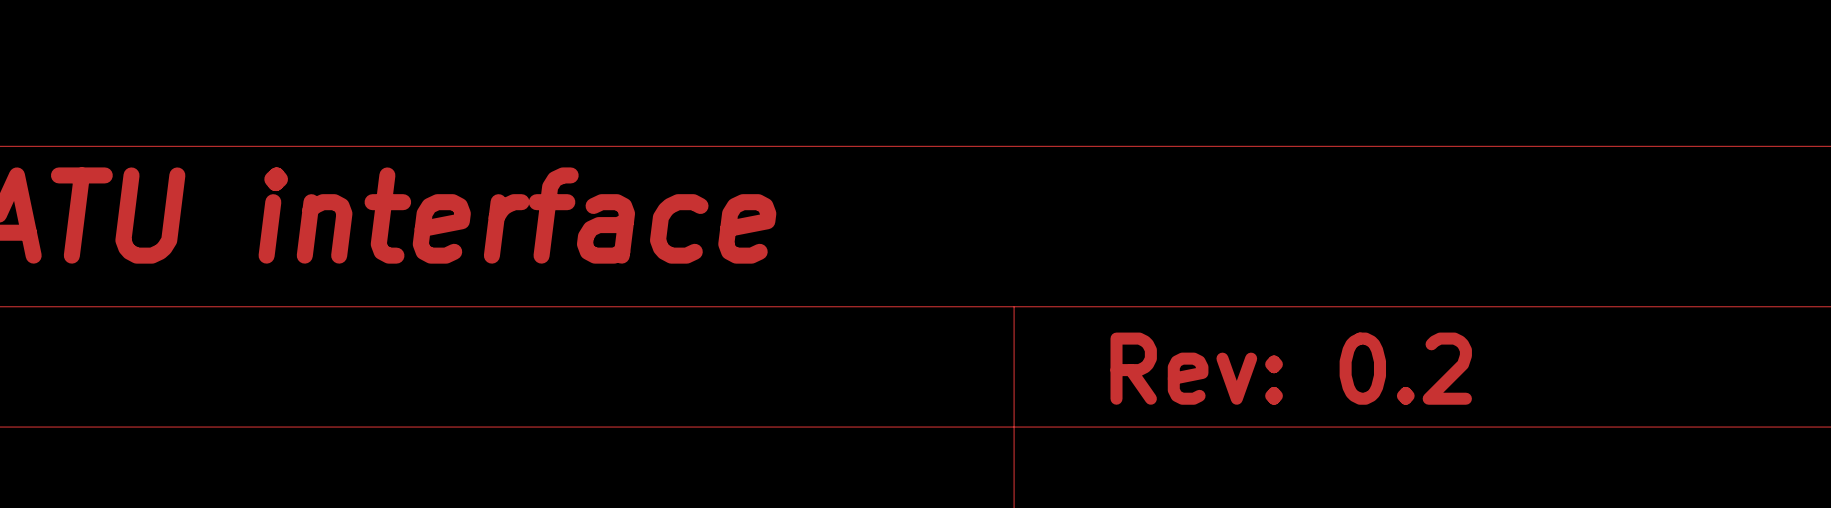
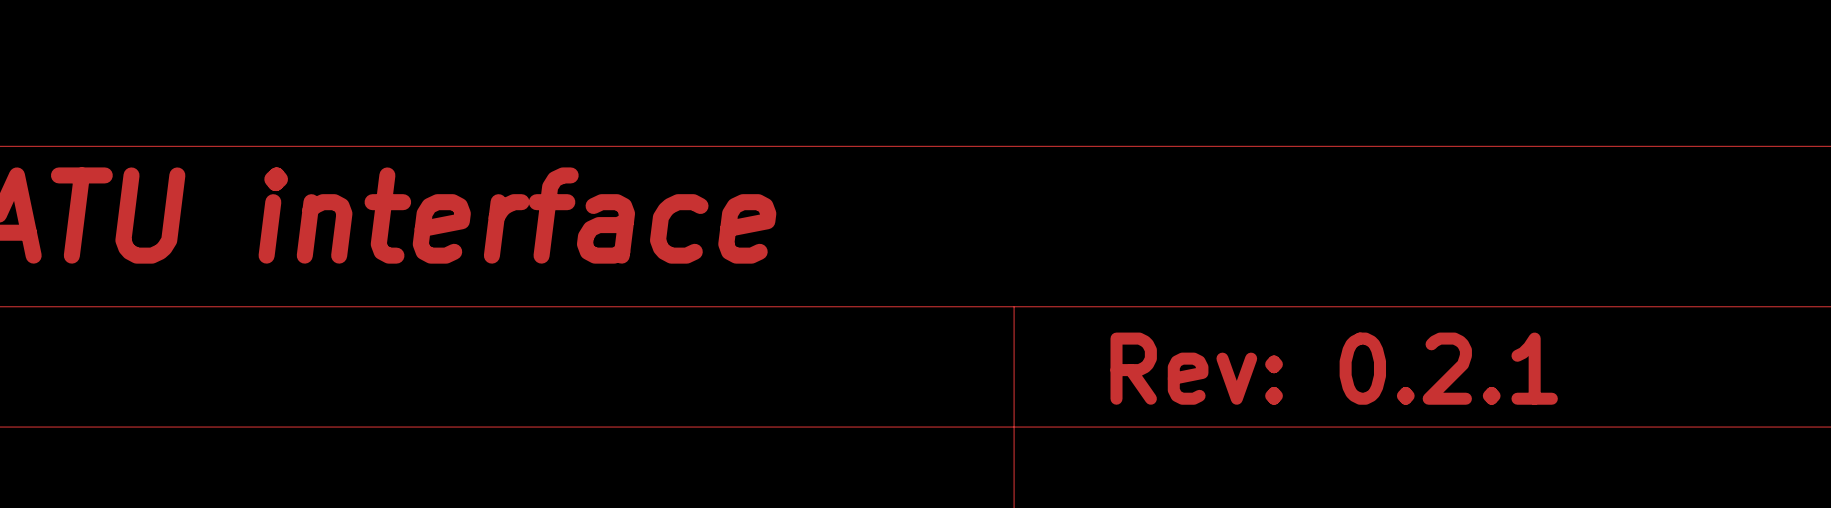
title block: Rev: 0.2 (1291, 368) -> Rev: 0.2.1 (1334, 368)

